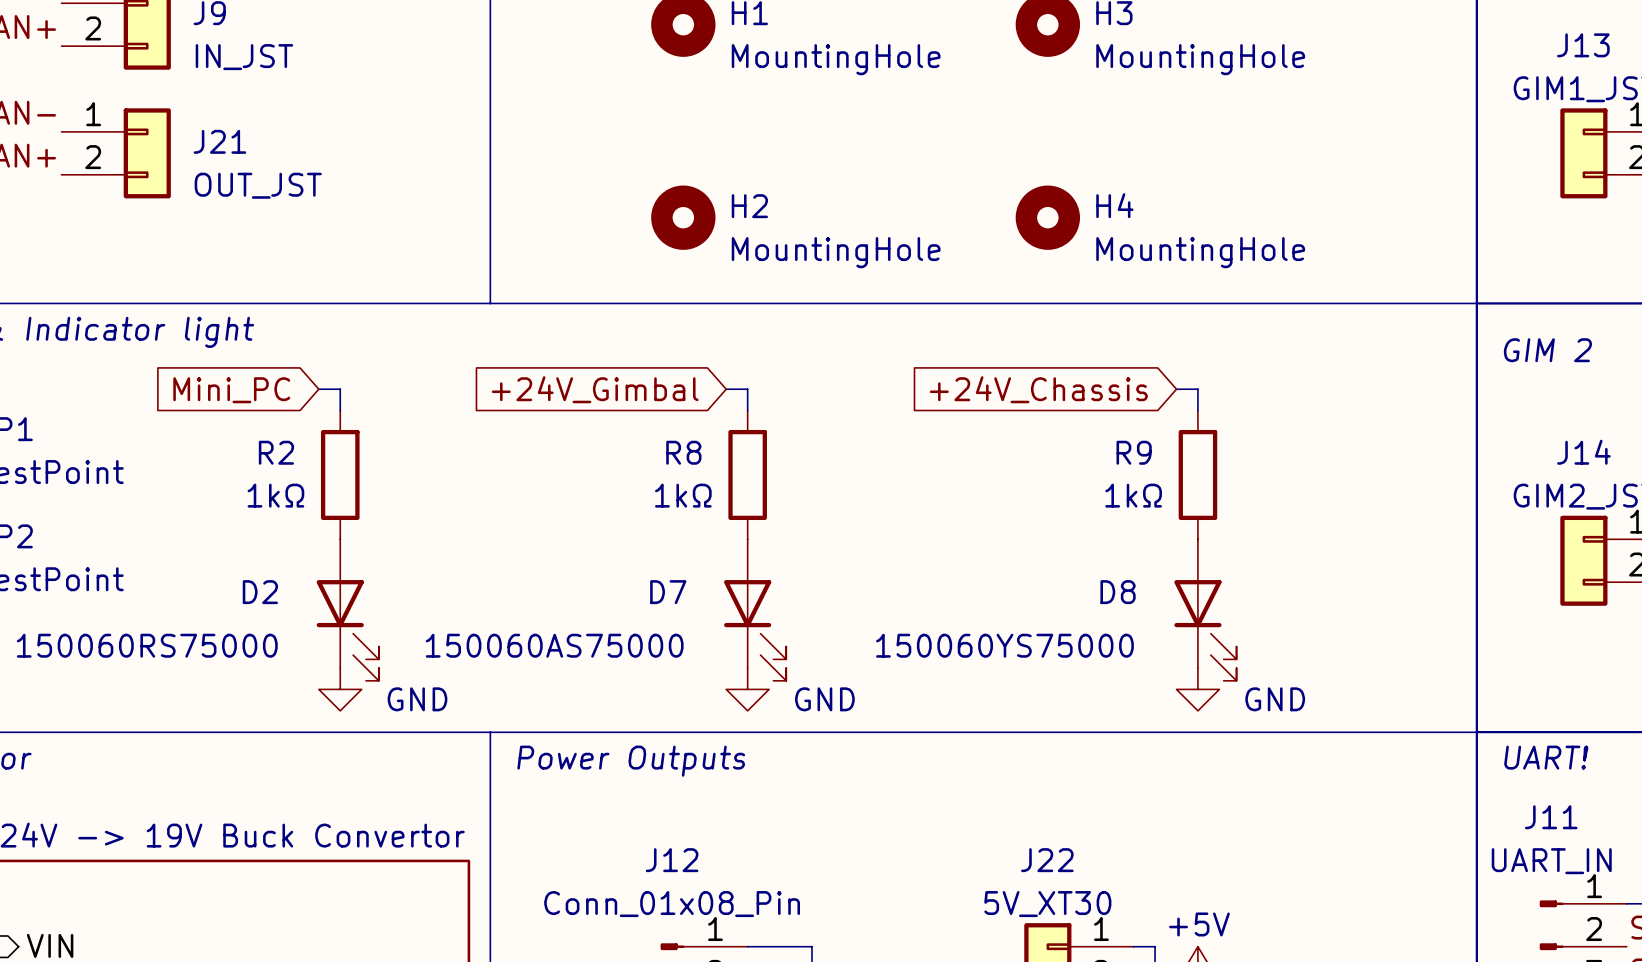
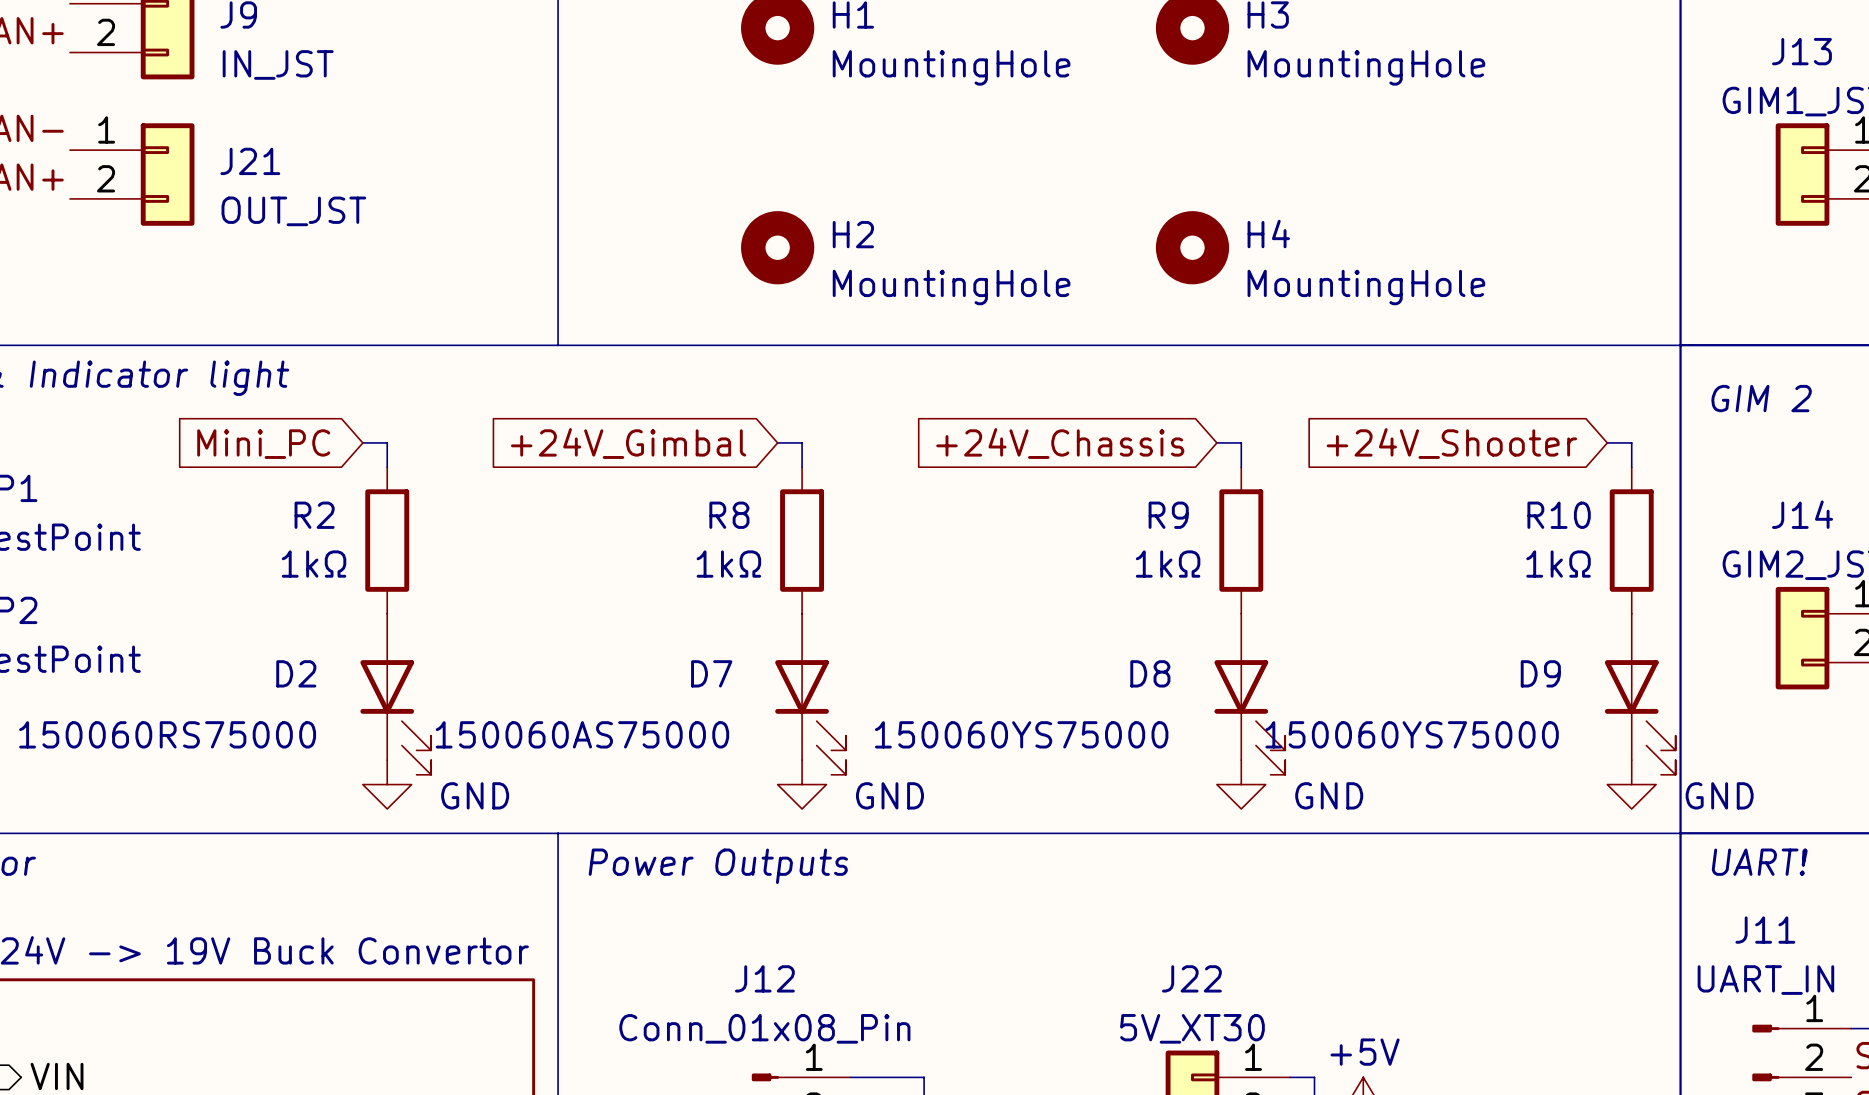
global label position: +24V_Gimbal (595, 389) -> +24V_Gimbal (628, 443)
wire: (726, 389) (747, 389) (747, 410) -> (777, 442) (802, 442) (802, 467)
global label position: +24V_Chassis (1038, 389) -> +24V_Chassis (1060, 443)
wire: (1176, 389) (1197, 389) (1197, 410) -> (1216, 442) (1241, 442) (1241, 467)
global label: none -> +24V_Shooter (1451, 443)
wire: none -> (1607, 442) (1631, 442) (1631, 467)
R8 position: (747, 474) -> (802, 540)
R9 position: (1197, 474) -> (1241, 540)
R10: none -> 1kΩ (1631, 540)
D7 position: (755, 610) -> (810, 694)
D8 position: (1205, 610) -> (1249, 694)
D9: none -> 150060YS75000 (1640, 694)
power symbol position: GND (747, 689) -> GND (802, 784)
power symbol position: GND (1197, 689) -> GND (1241, 784)
power symbol: none -> GND (1631, 784)

